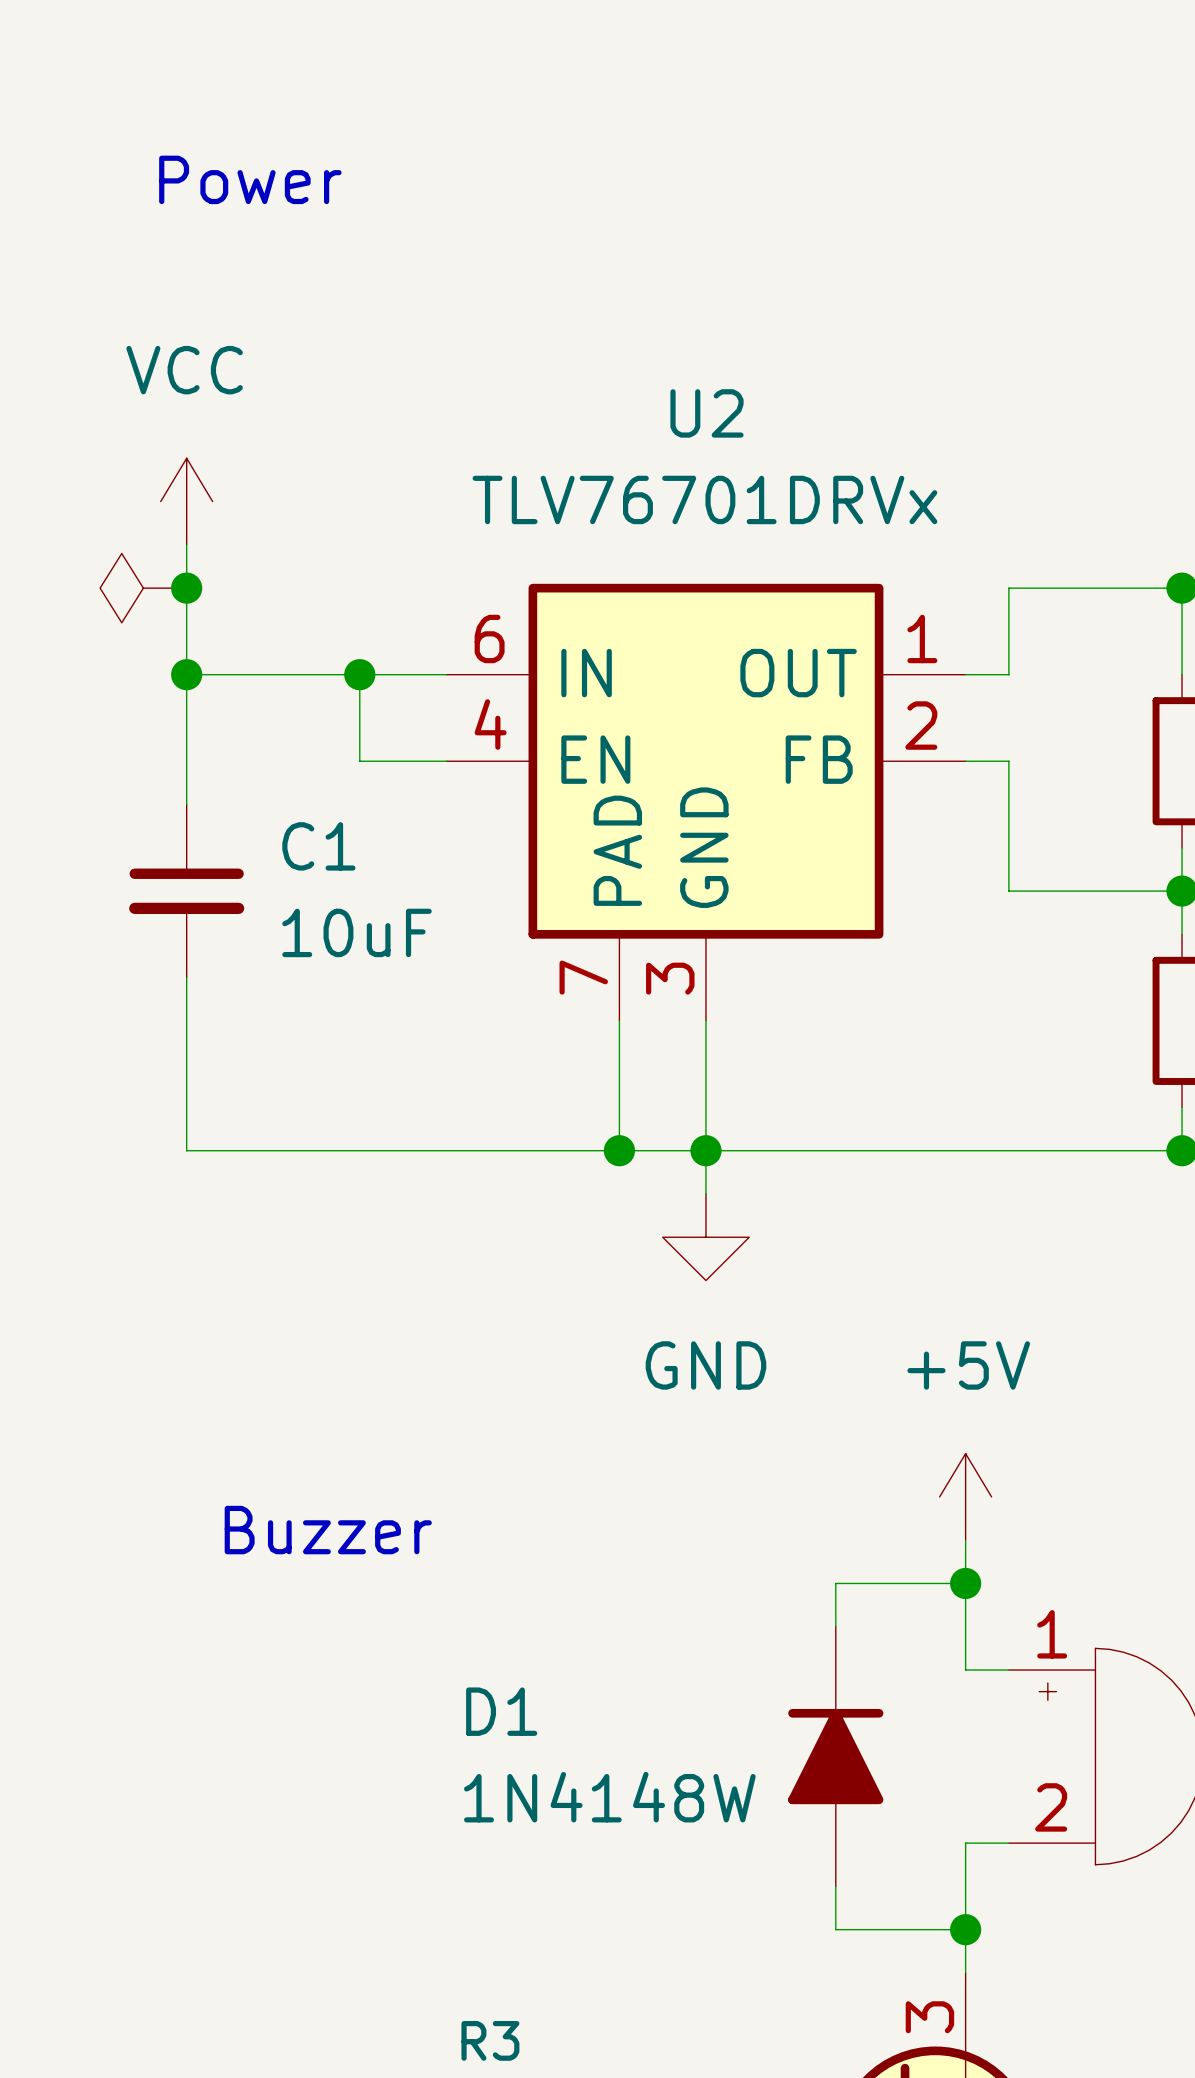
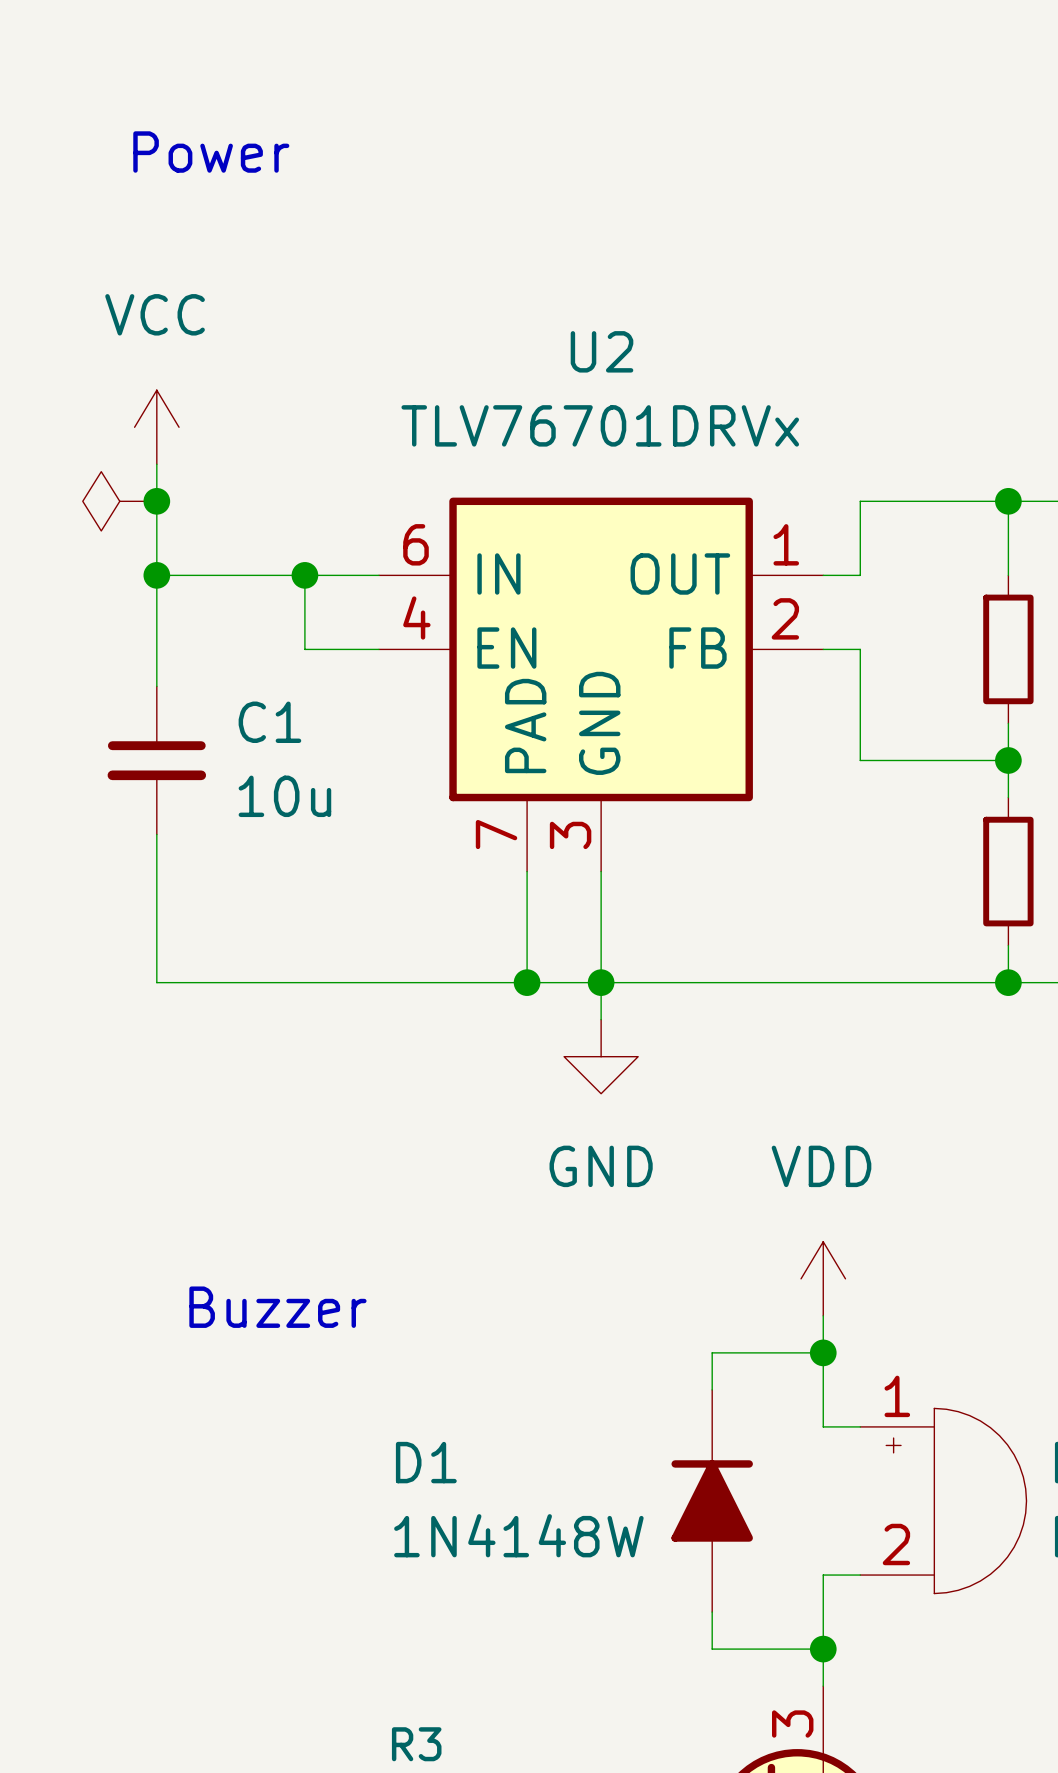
C1 value: 10uF (357, 932) -> 10u (284, 796)
power symbol: +5V (965, 1496) -> VDD (823, 1278)

